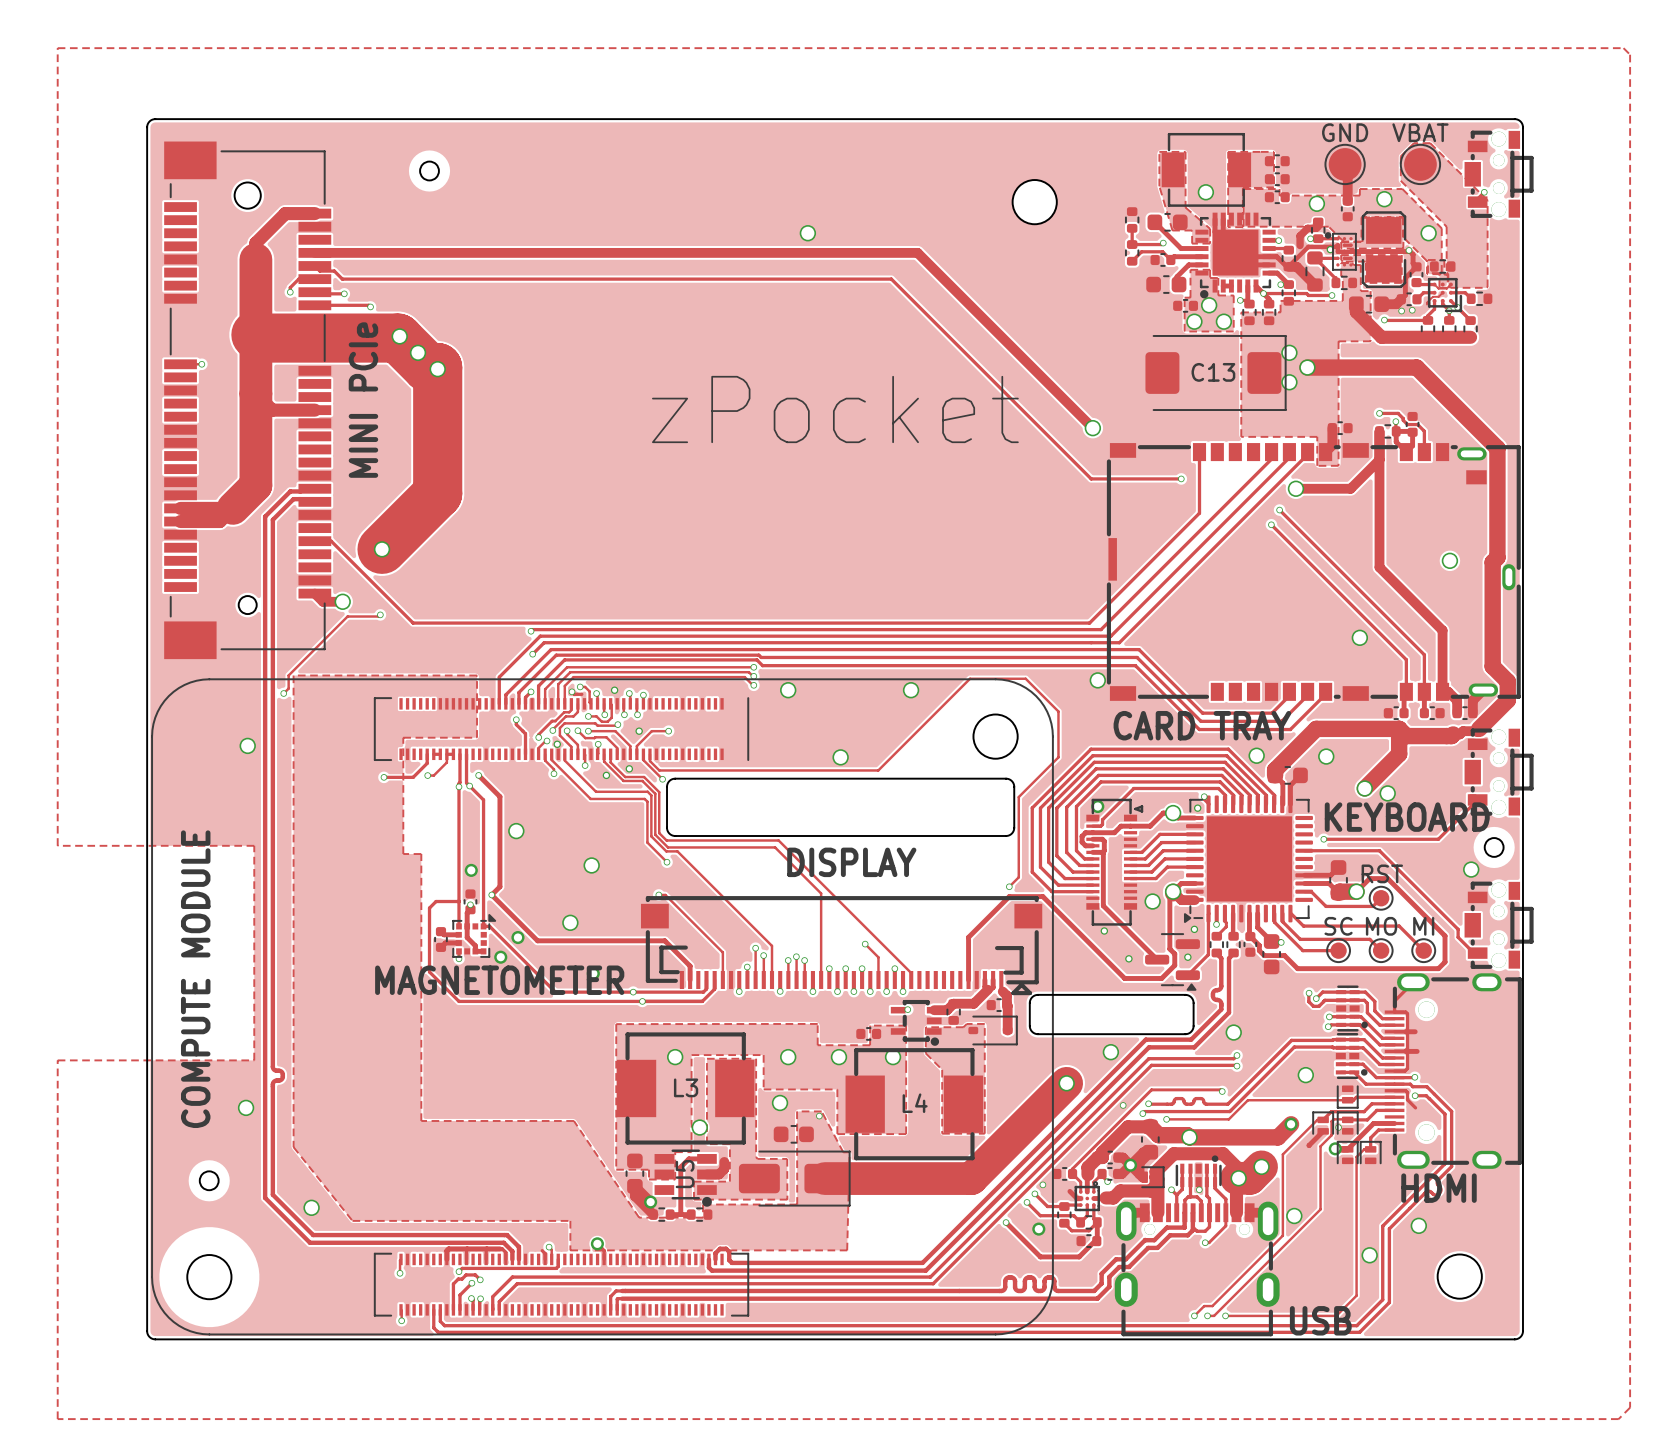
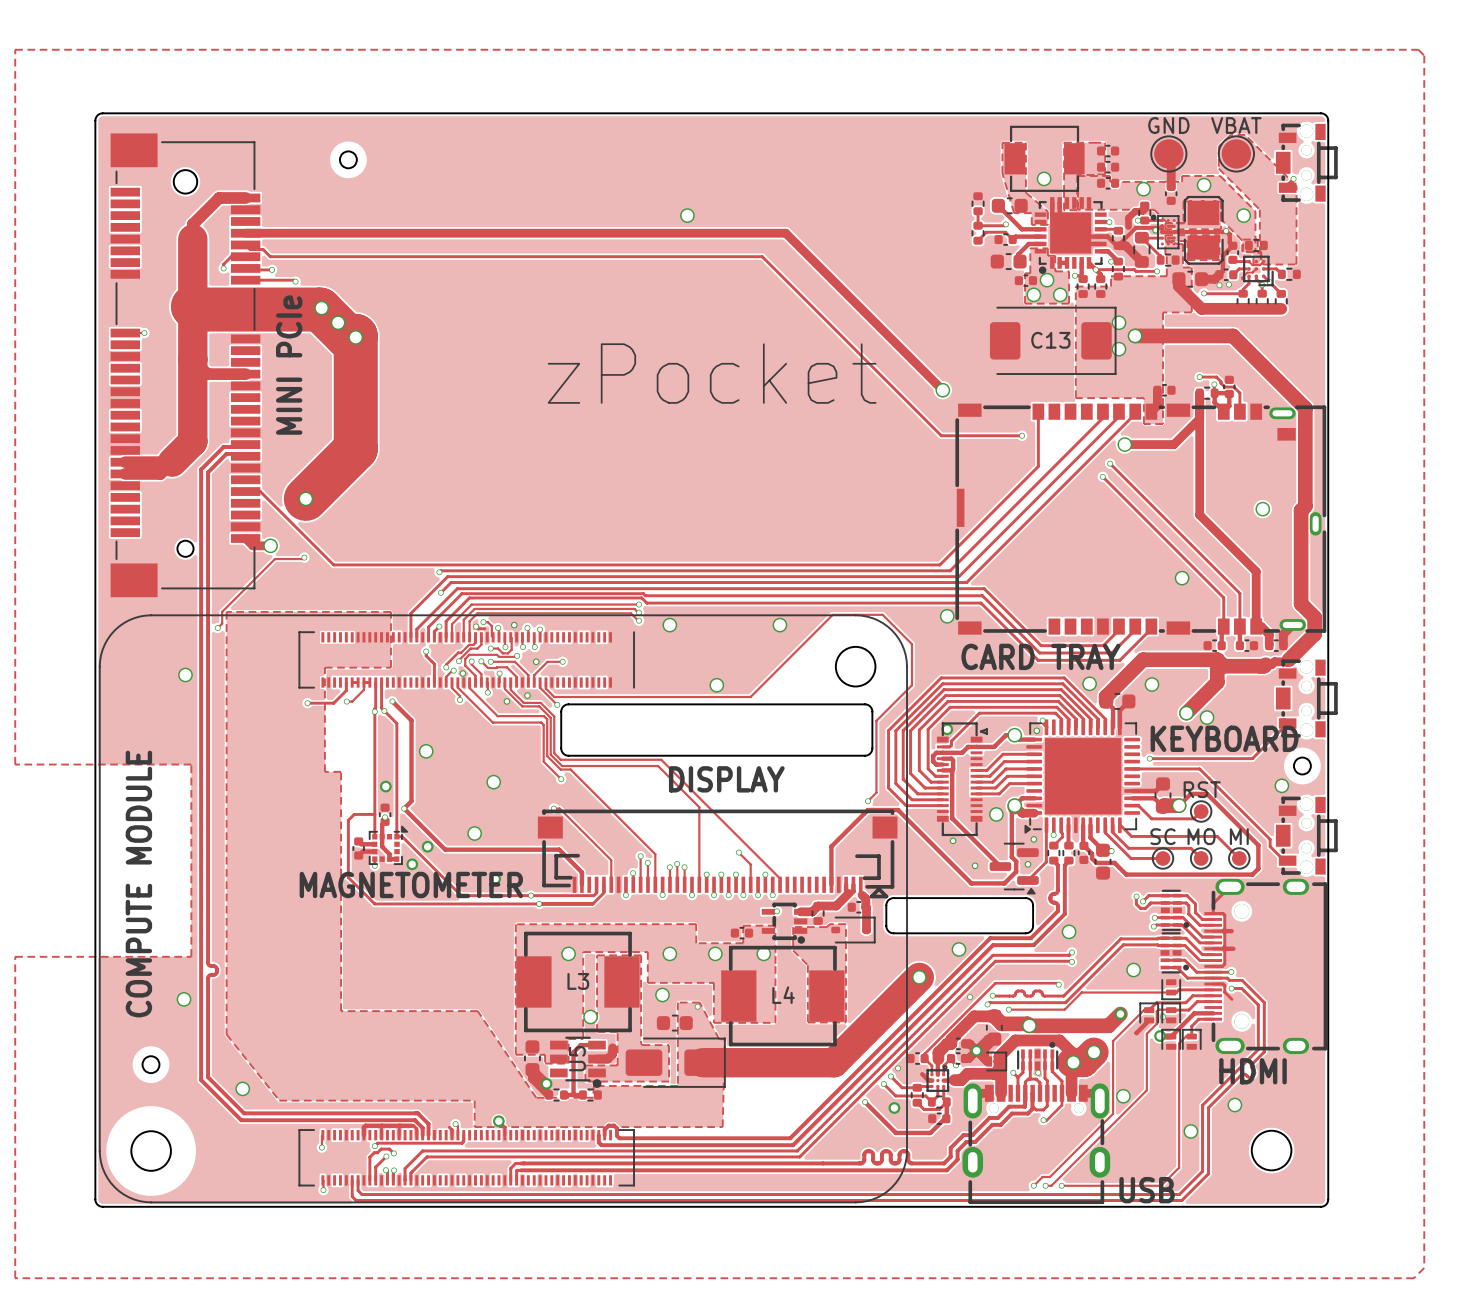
part: (1034, 202) -> none

